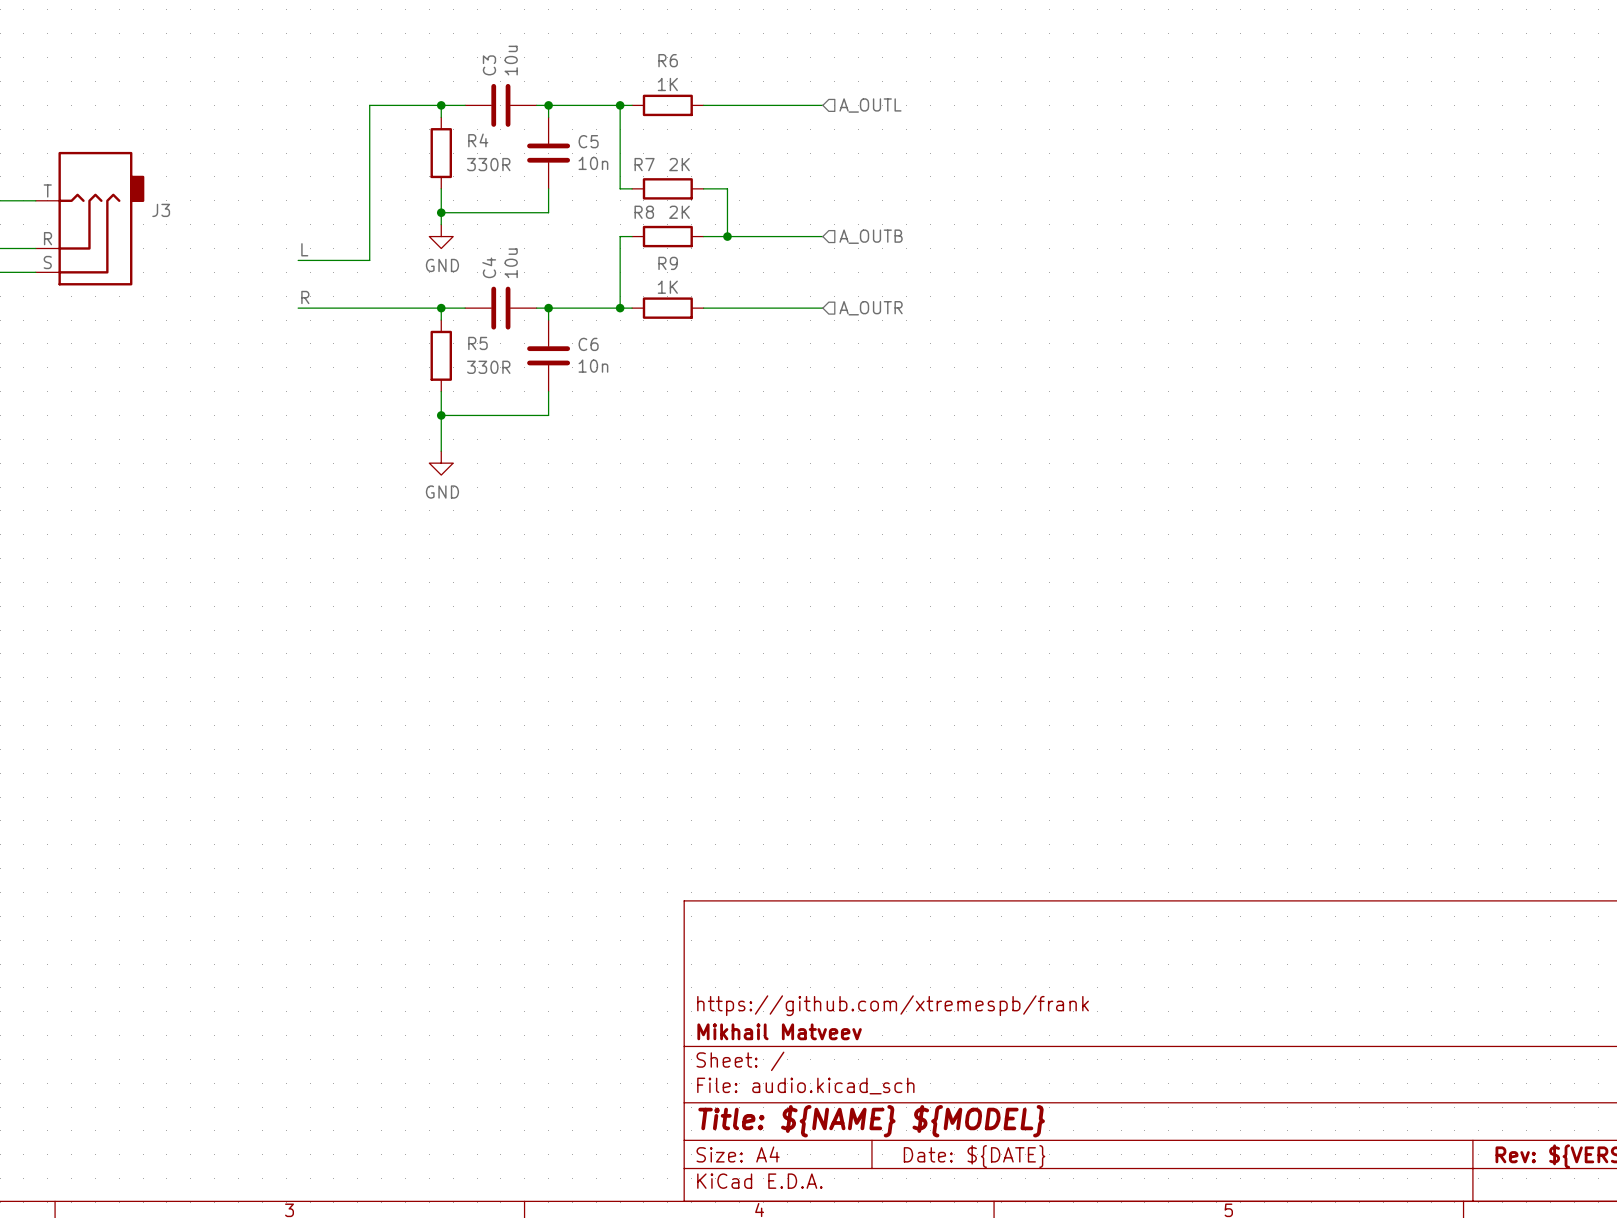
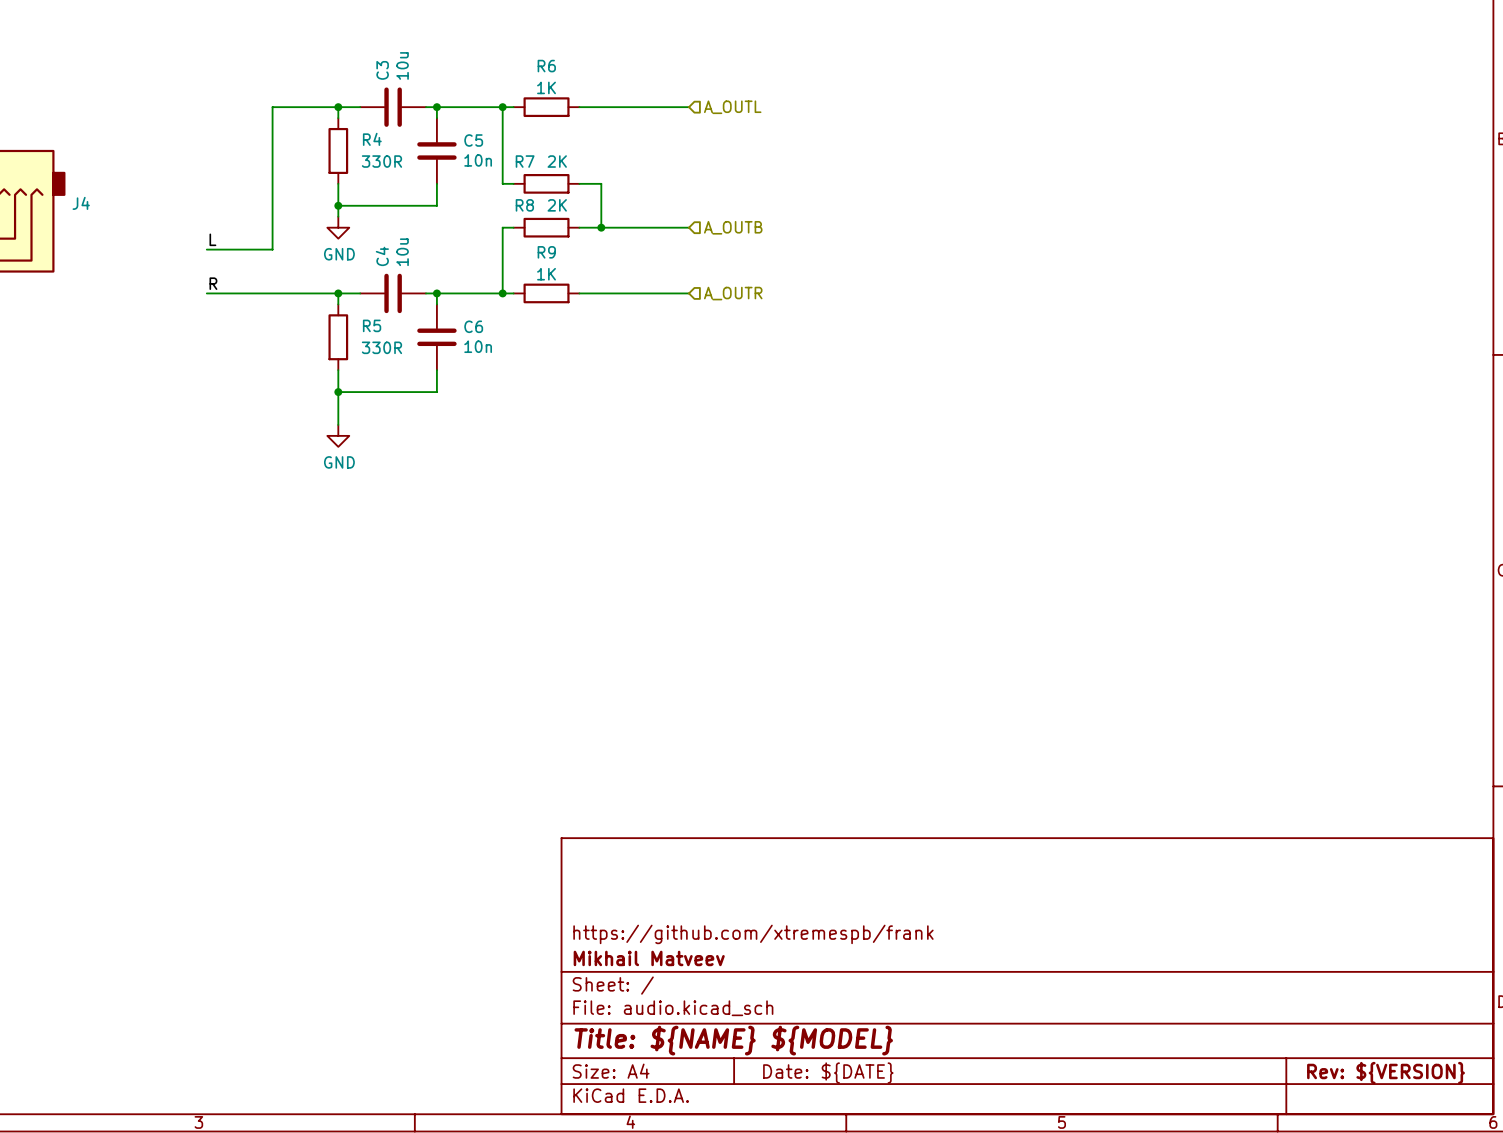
J3 name: J3 (161, 210) -> J4 (81, 203)

